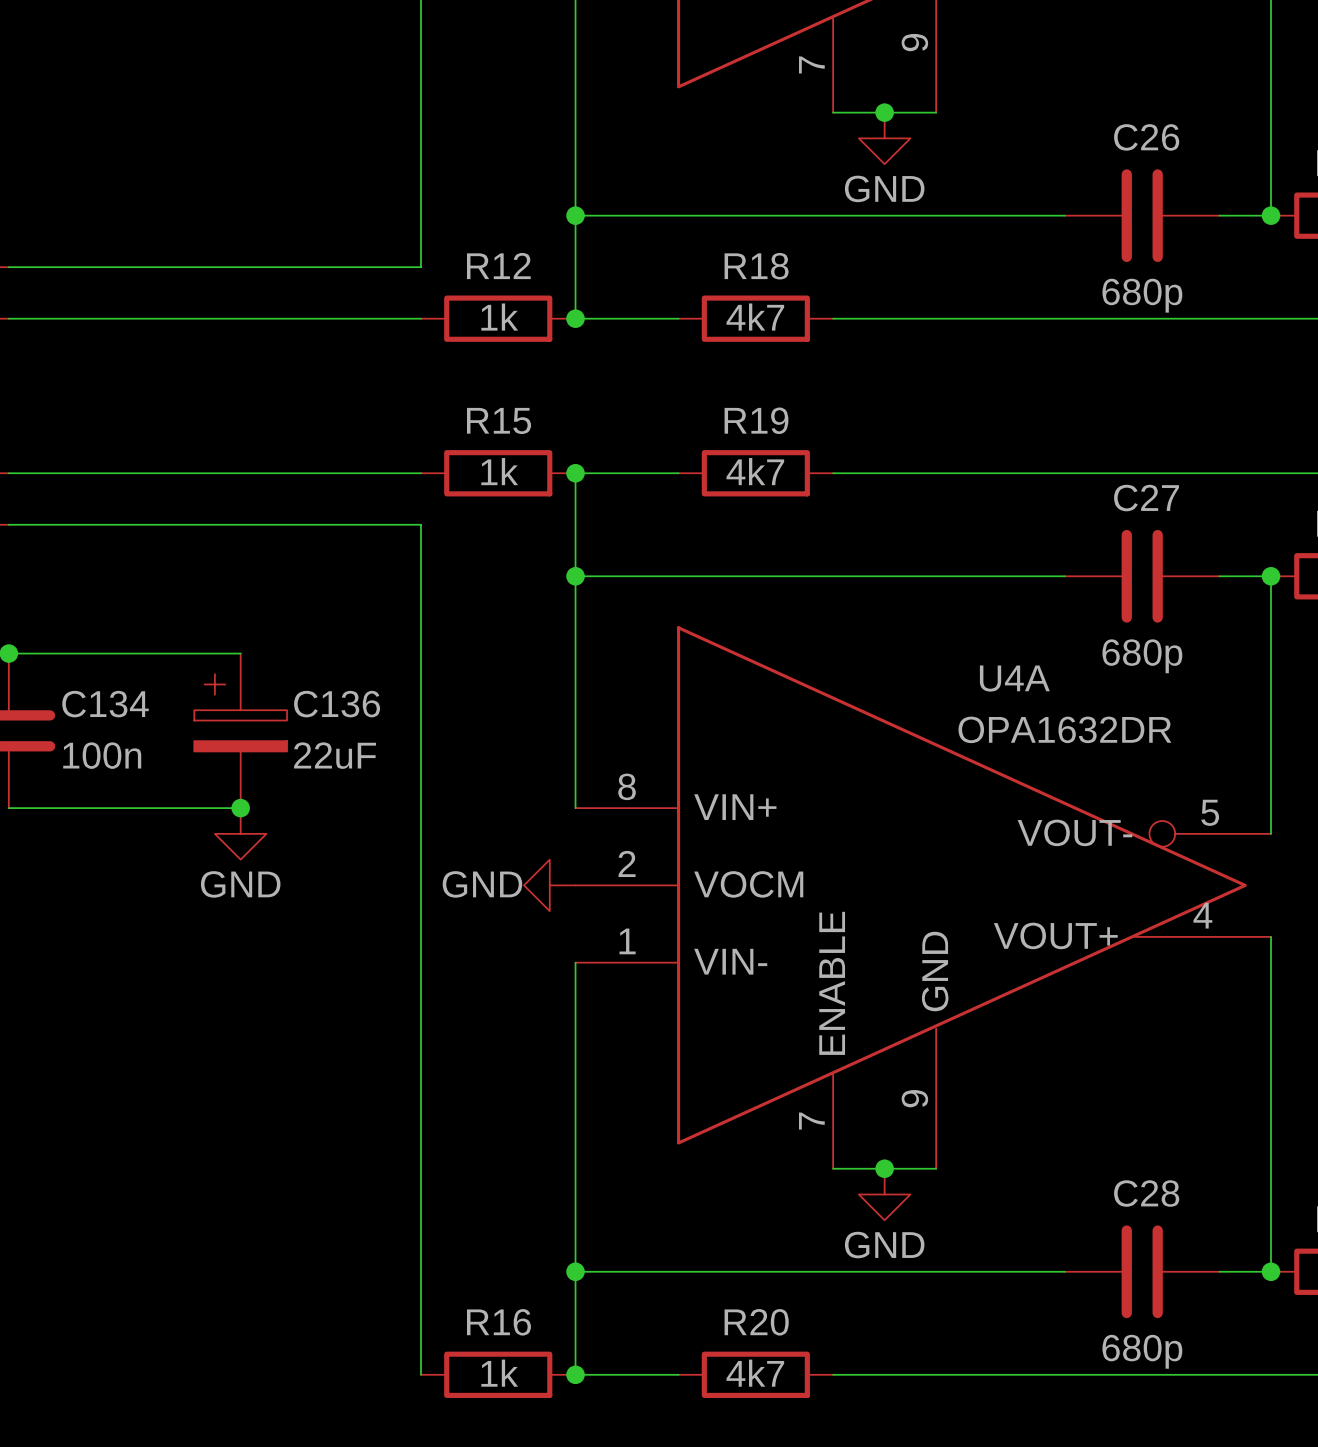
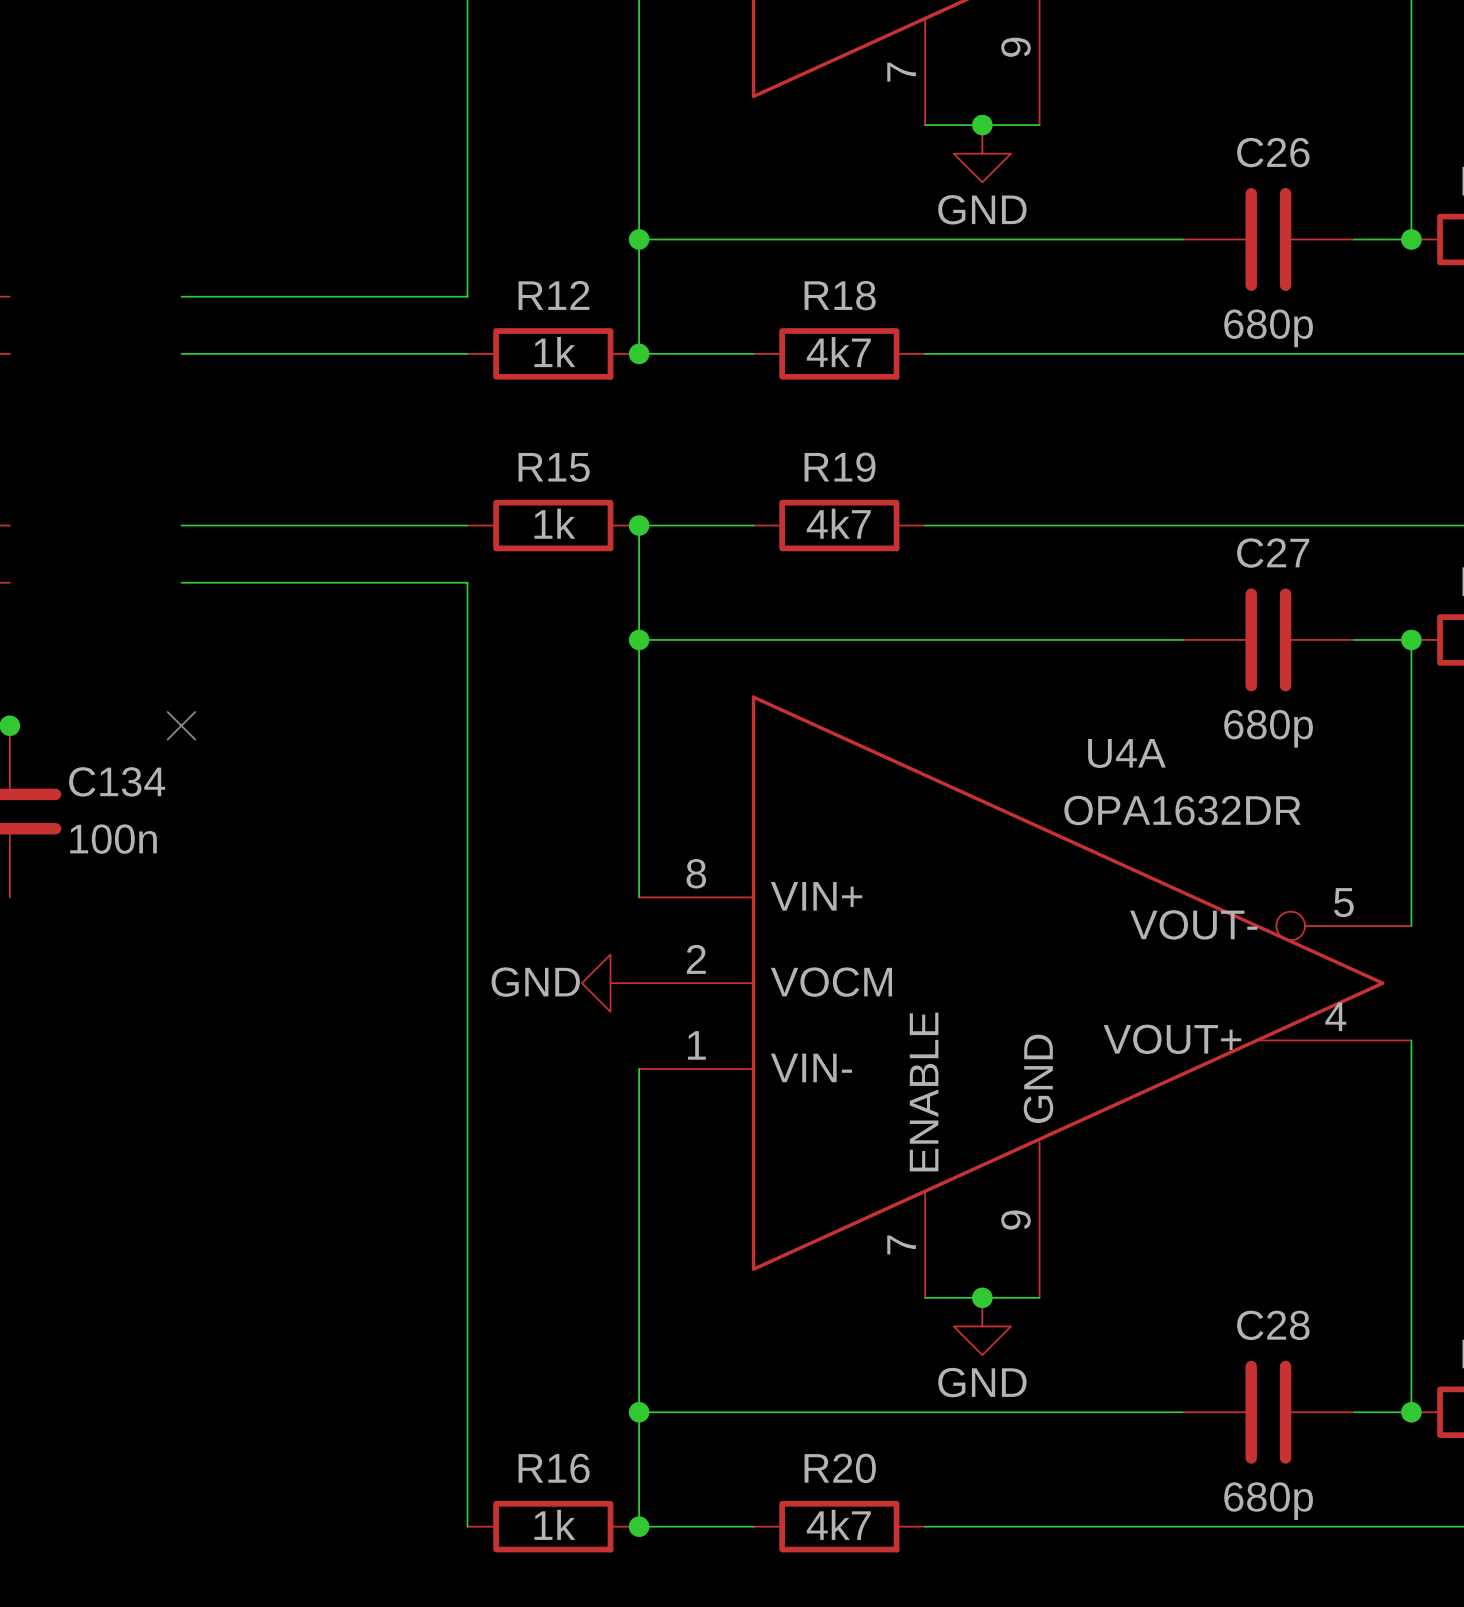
wire: (8, 267) (163, 267) -> none
wire: (8, 318) (163, 318) -> none
wire: (8, 473) (163, 473) -> none
wire: (8, 524) (163, 524) -> none
wire: (8, 653) (240, 653) -> none
no-connect mark: none -> (181, 725)
C136: 22uF (240, 730) -> none
wire: (8, 808) (240, 808) -> none
junction: (240, 808) -> none
power symbol: GND (240, 833) -> none

